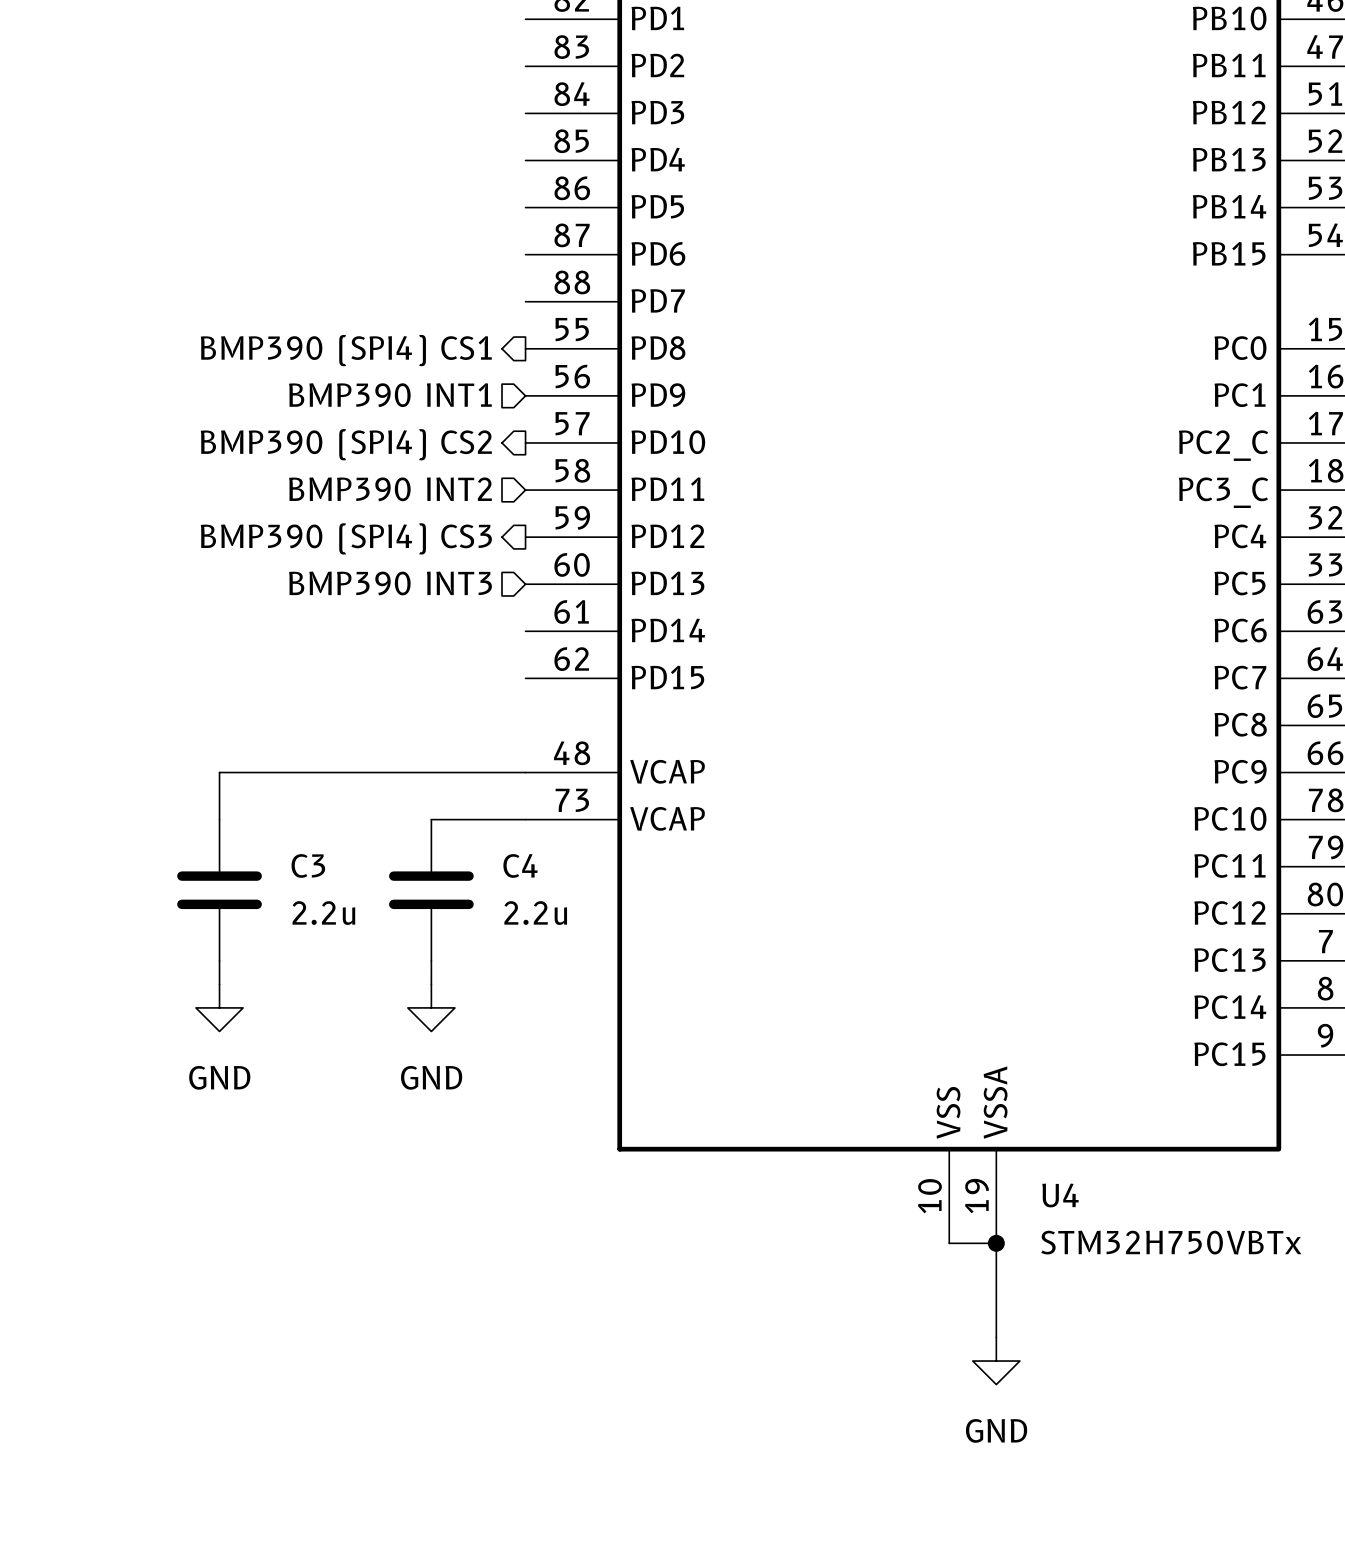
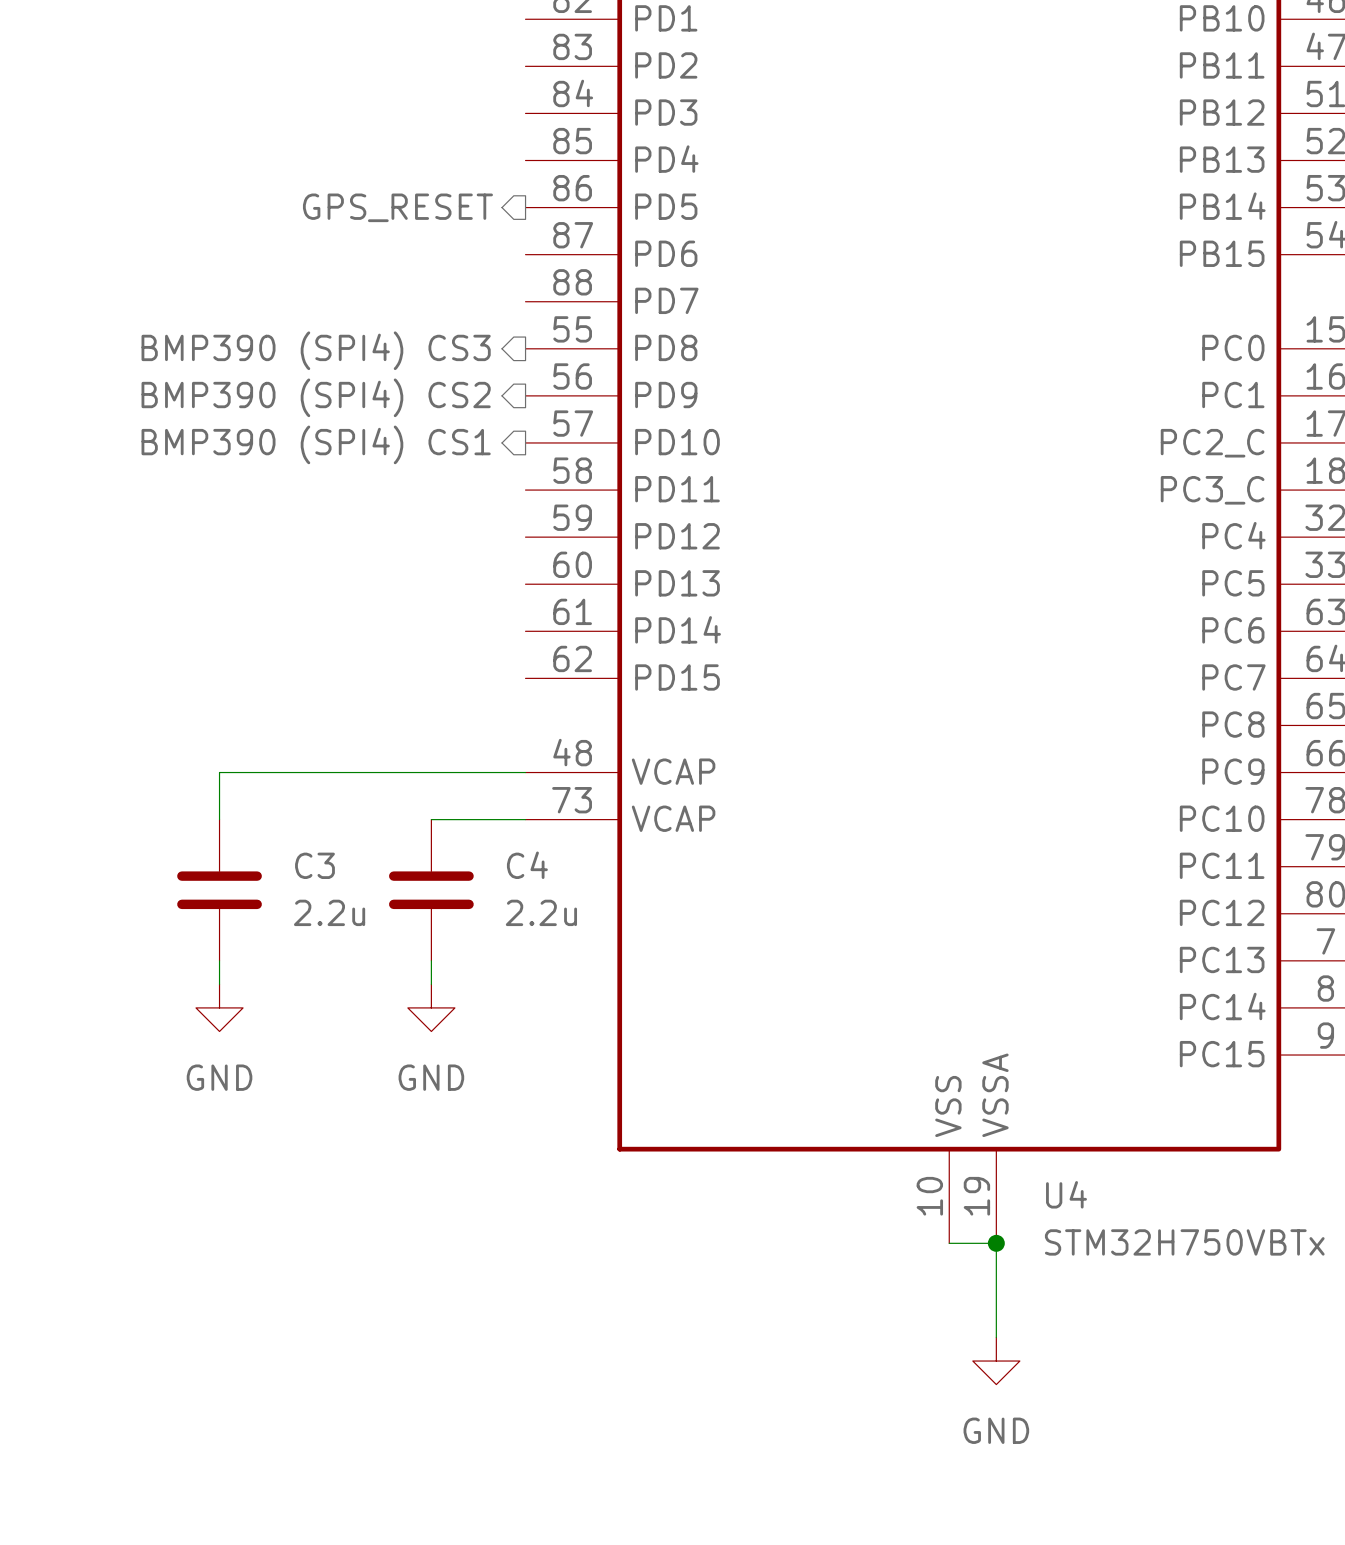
hierarchical label: none -> GPS_RESET (397, 207)
hierarchical label: BMP390 (SPI4) CS1 (346, 350) -> BMP390 (SPI4) CS3 (316, 350)
hierarchical label shape: input (390, 395) -> output (316, 397)
hierarchical label: BMP390 INT1 (390, 395) -> BMP390 (SPI4) CS2 (316, 397)
hierarchical label: BMP390 (SPI4) CS2 (346, 444) -> BMP390 (SPI4) CS1 (316, 444)
hierarchical label: BMP390 INT2 (390, 489) -> none
hierarchical label: BMP390 (SPI4) CS3 (346, 538) -> none
hierarchical label: BMP390 INT3 (390, 583) -> none

